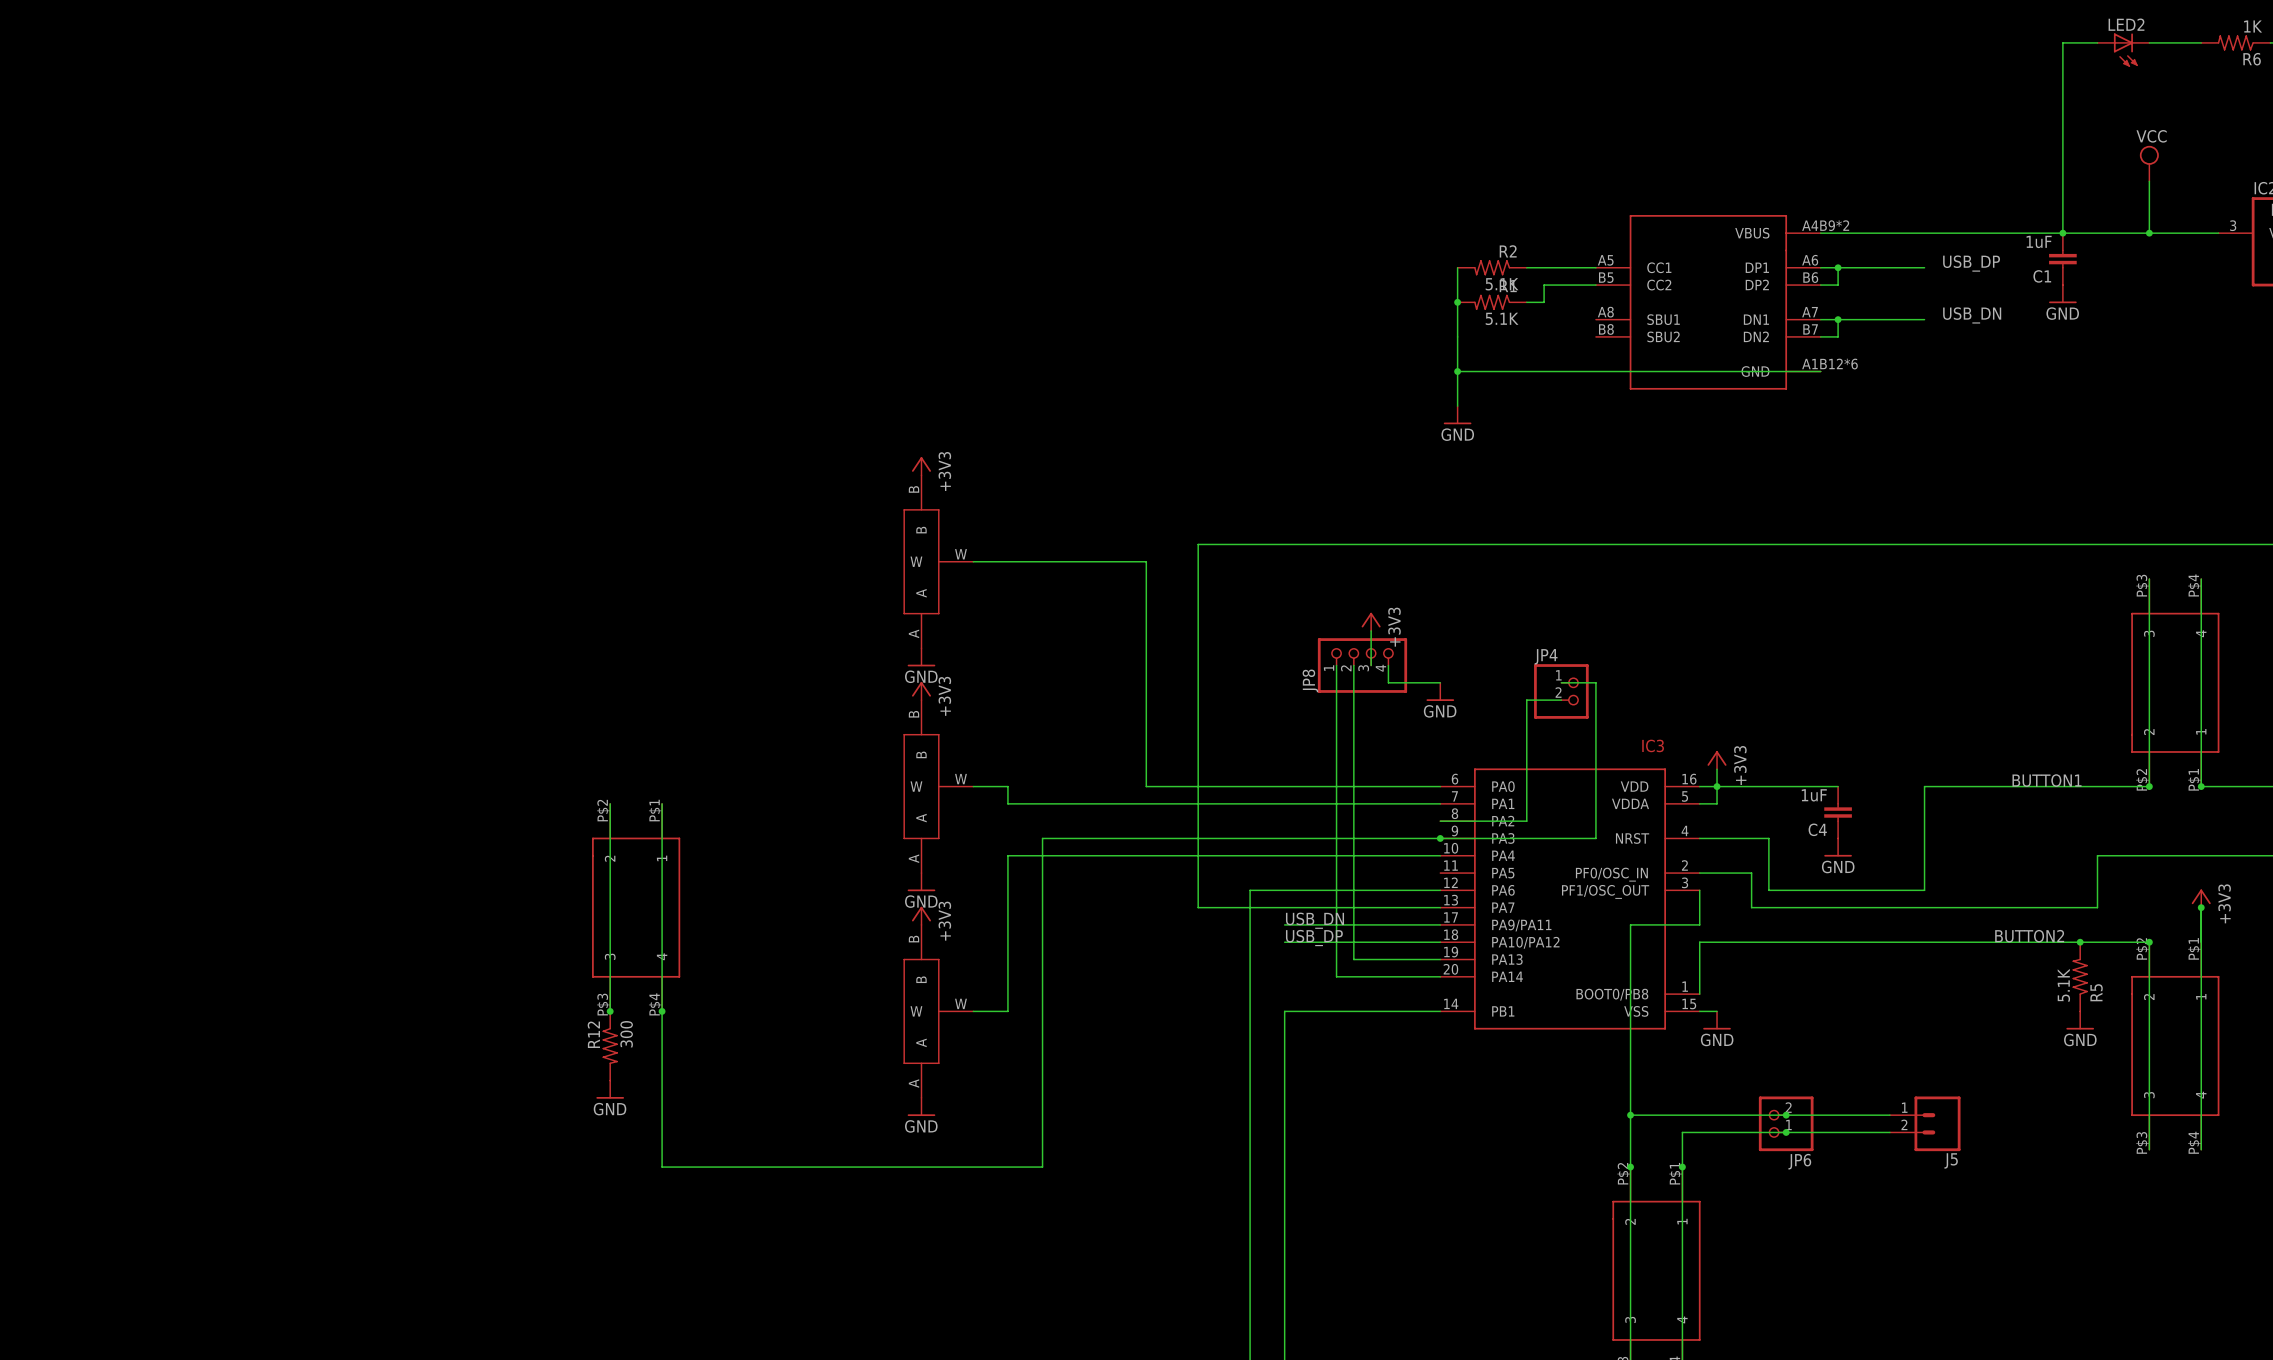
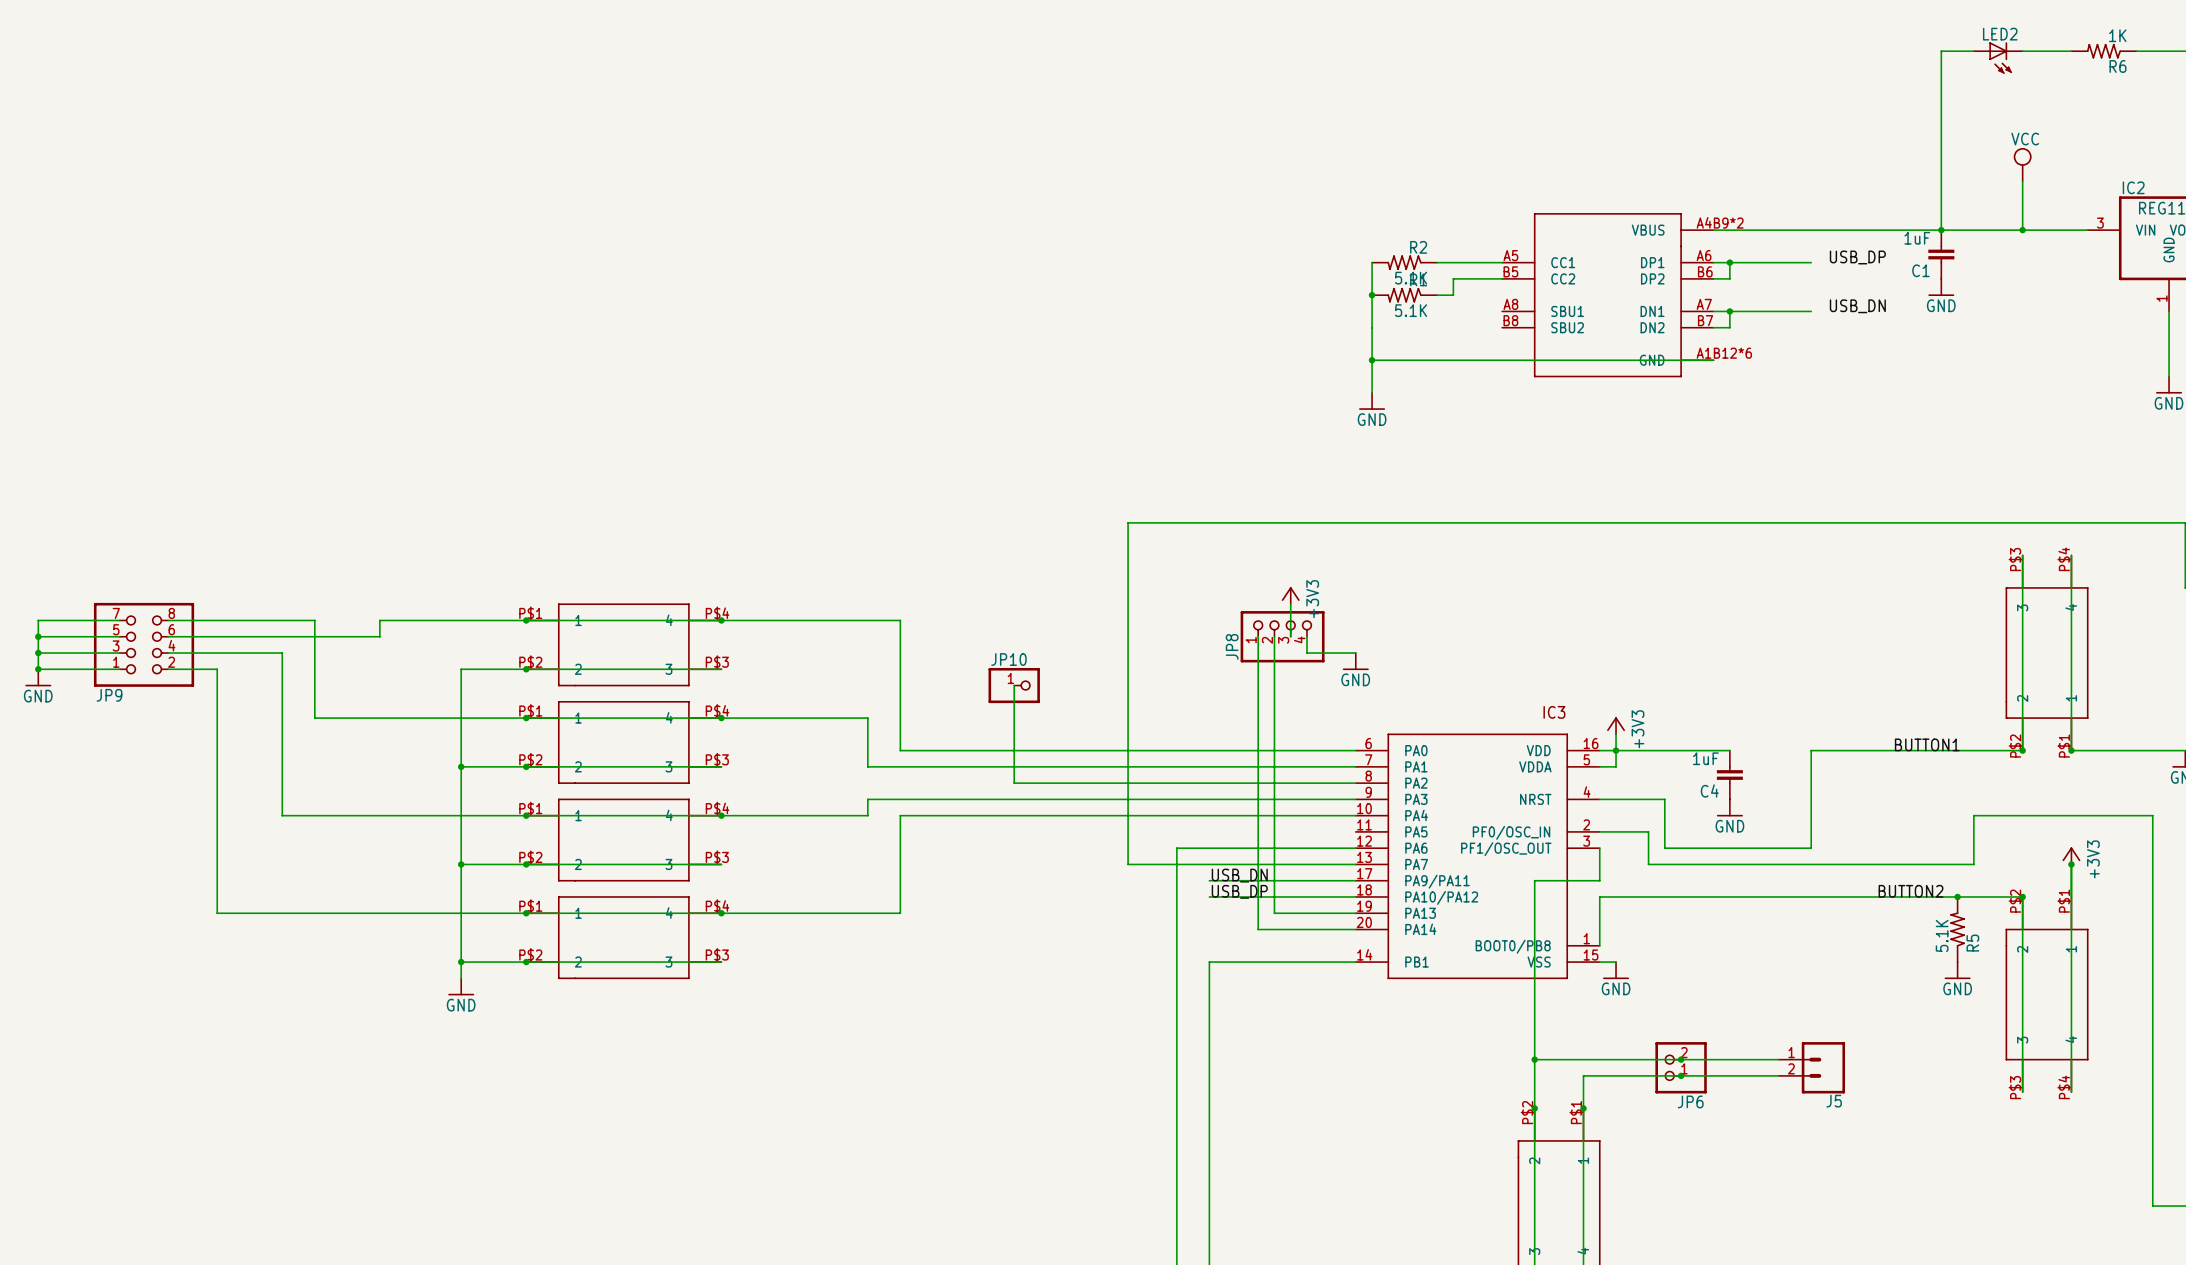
power symbol: +3V3 (921, 466) -> none
part: (938, 561) -> none
wire: (973, 561) (1146, 561) (1146, 786) -> none
wire: none -> (119, 620) (38, 620) (38, 669) (119, 669)
wire: none -> (168, 620) (314, 620) (314, 718) (867, 718) (867, 766) (949, 766)
junction: none -> (526, 620)
junction: none -> (721, 620)
power symbol: GND (921, 657) -> none
wire: none -> (38, 636) (119, 636)
junction: none -> (38, 636)
wire: none -> (168, 636) (379, 636) (379, 620) (900, 620) (900, 750) (916, 750)
JP9: none -> (144, 644)
part: none -> (623, 644)
wire: none -> (38, 653) (119, 653)
junction: none -> (38, 653)
wire: (1561, 682) (1595, 682) (1595, 838) (1440, 838) -> none
power symbol: +3V3 (921, 691) -> none
JP4: (1561, 691) -> none
junction: none -> (38, 669)
junction: none -> (526, 669)
wire: none -> (721, 669) (461, 669) (461, 978)
wire: (1561, 700) (1526, 700) (1526, 821) (1440, 821) -> (1014, 685) (1014, 783) (1355, 783)
power symbol: none -> GND (38, 677)
JP10: none -> (1014, 685)
junction: none -> (526, 718)
junction: none -> (721, 718)
part: none -> (623, 742)
part: (938, 786) -> none
wire: (1007, 786) (1007, 803) -> (949, 750) (1079, 750)
wire: none -> (461, 766) (721, 766)
junction: none -> (461, 766)
junction: none -> (526, 766)
wire: (610, 803) (610, 1011) -> none
wire: (662, 803) (662, 1167) (1042, 1167) (1042, 838) -> (168, 653) (282, 653) (282, 815) (867, 815) (867, 799) (981, 799)
junction: (1440, 838) -> none
junction: none -> (526, 815)
junction: none -> (721, 815)
wire: (1007, 855) (1007, 1011) (973, 1011) -> (949, 815) (900, 815) (900, 913) (217, 913) (217, 669) (168, 669)
power symbol: GND (921, 882) -> none
wire: none -> (461, 864) (721, 864)
junction: none -> (461, 864)
junction: none -> (526, 864)
part rotation: 0° (636, 907) -> 90° counterclockwise (623, 840)
power symbol: +3V3 (921, 915) -> none
junction: none -> (526, 913)
junction: none -> (721, 913)
part: none -> (623, 937)
wire: none -> (461, 962) (721, 962)
junction: none -> (461, 962)
junction: none -> (526, 962)
junction: (610, 1011) -> none
junction: (662, 1011) -> none
part: (938, 1011) -> none
R12: 300 (610, 1045) -> none
power symbol position: GND (610, 1089) -> GND (461, 986)
power symbol: GND (921, 1106) -> none

